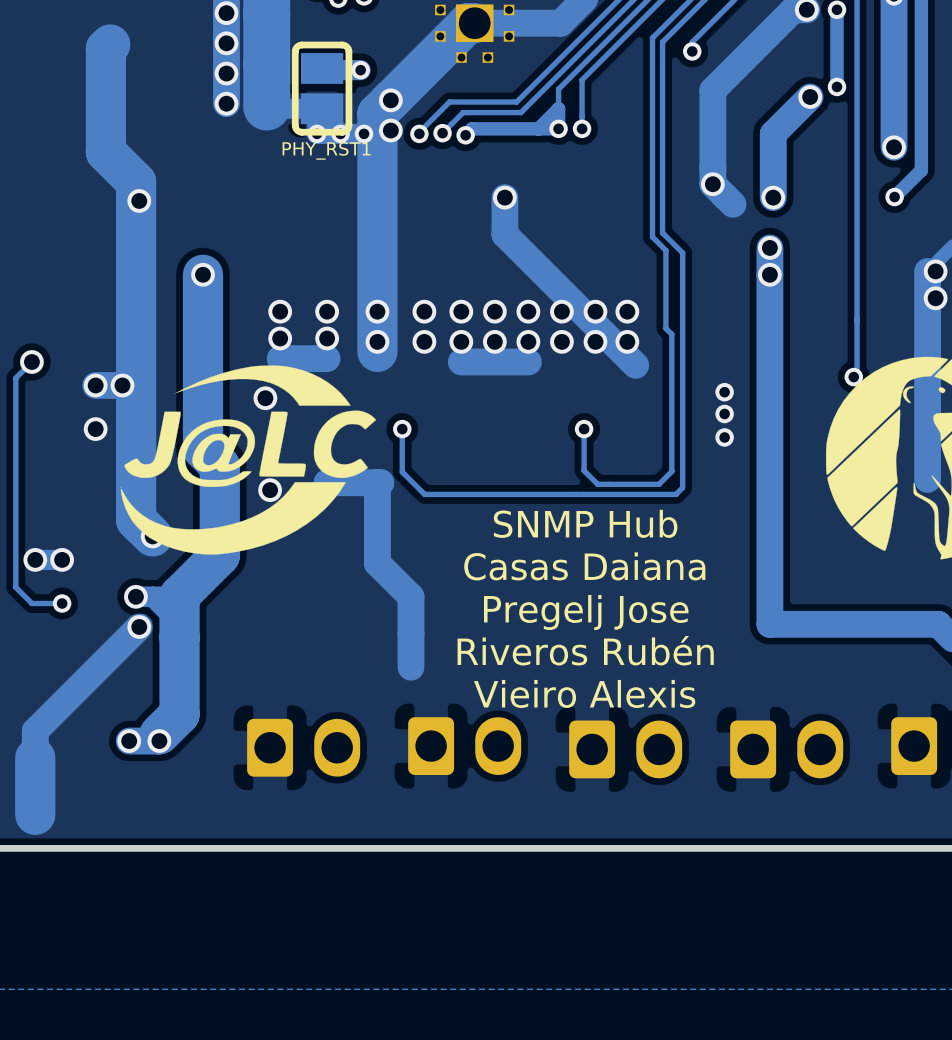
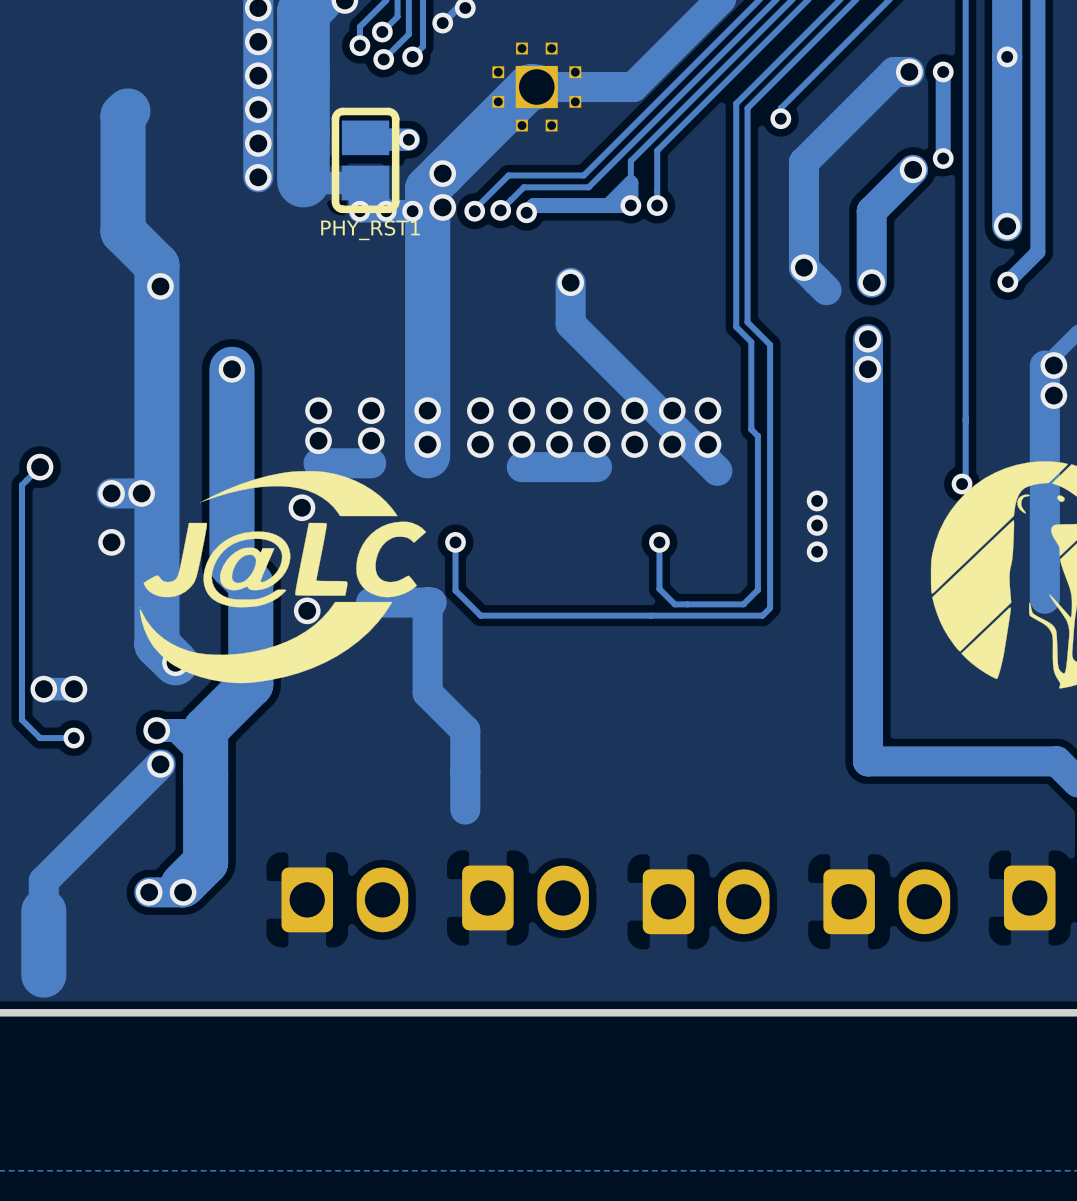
text: SNMP Hub (585, 523) -> none
text: Casas Daiana (584, 566) -> none
text: Pregelj Jose (586, 612) -> none
text: Riveros Rubén (585, 650) -> none
text: Vieiro Alexis (584, 693) -> none

